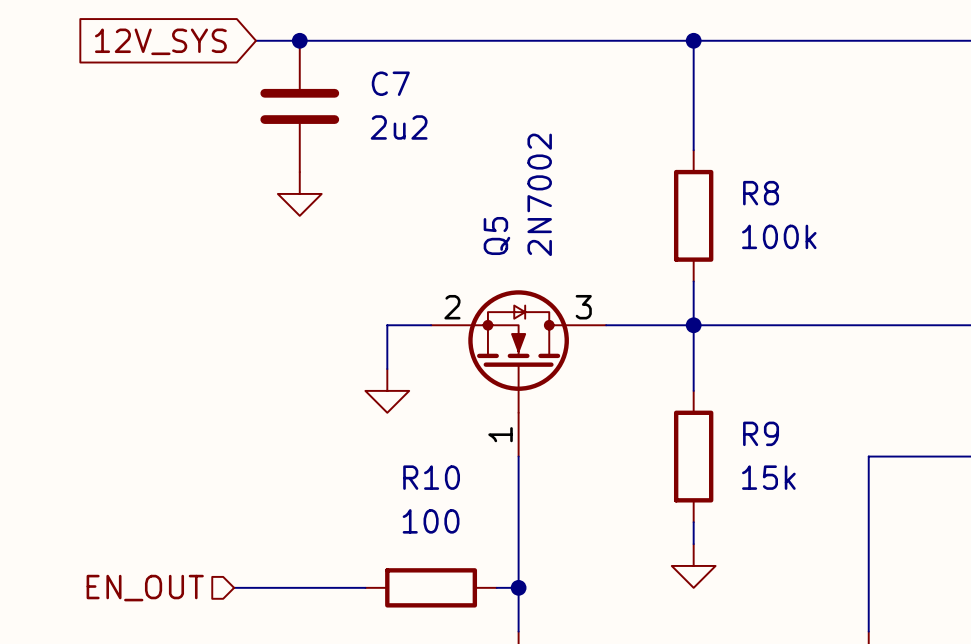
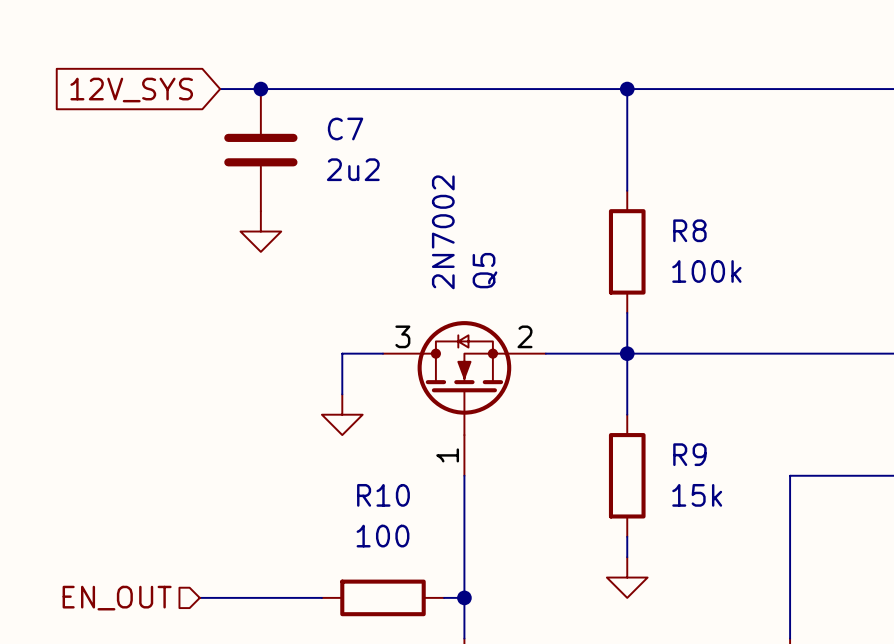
Q5 flip: as is (518, 351) -> left-right (464, 378)

